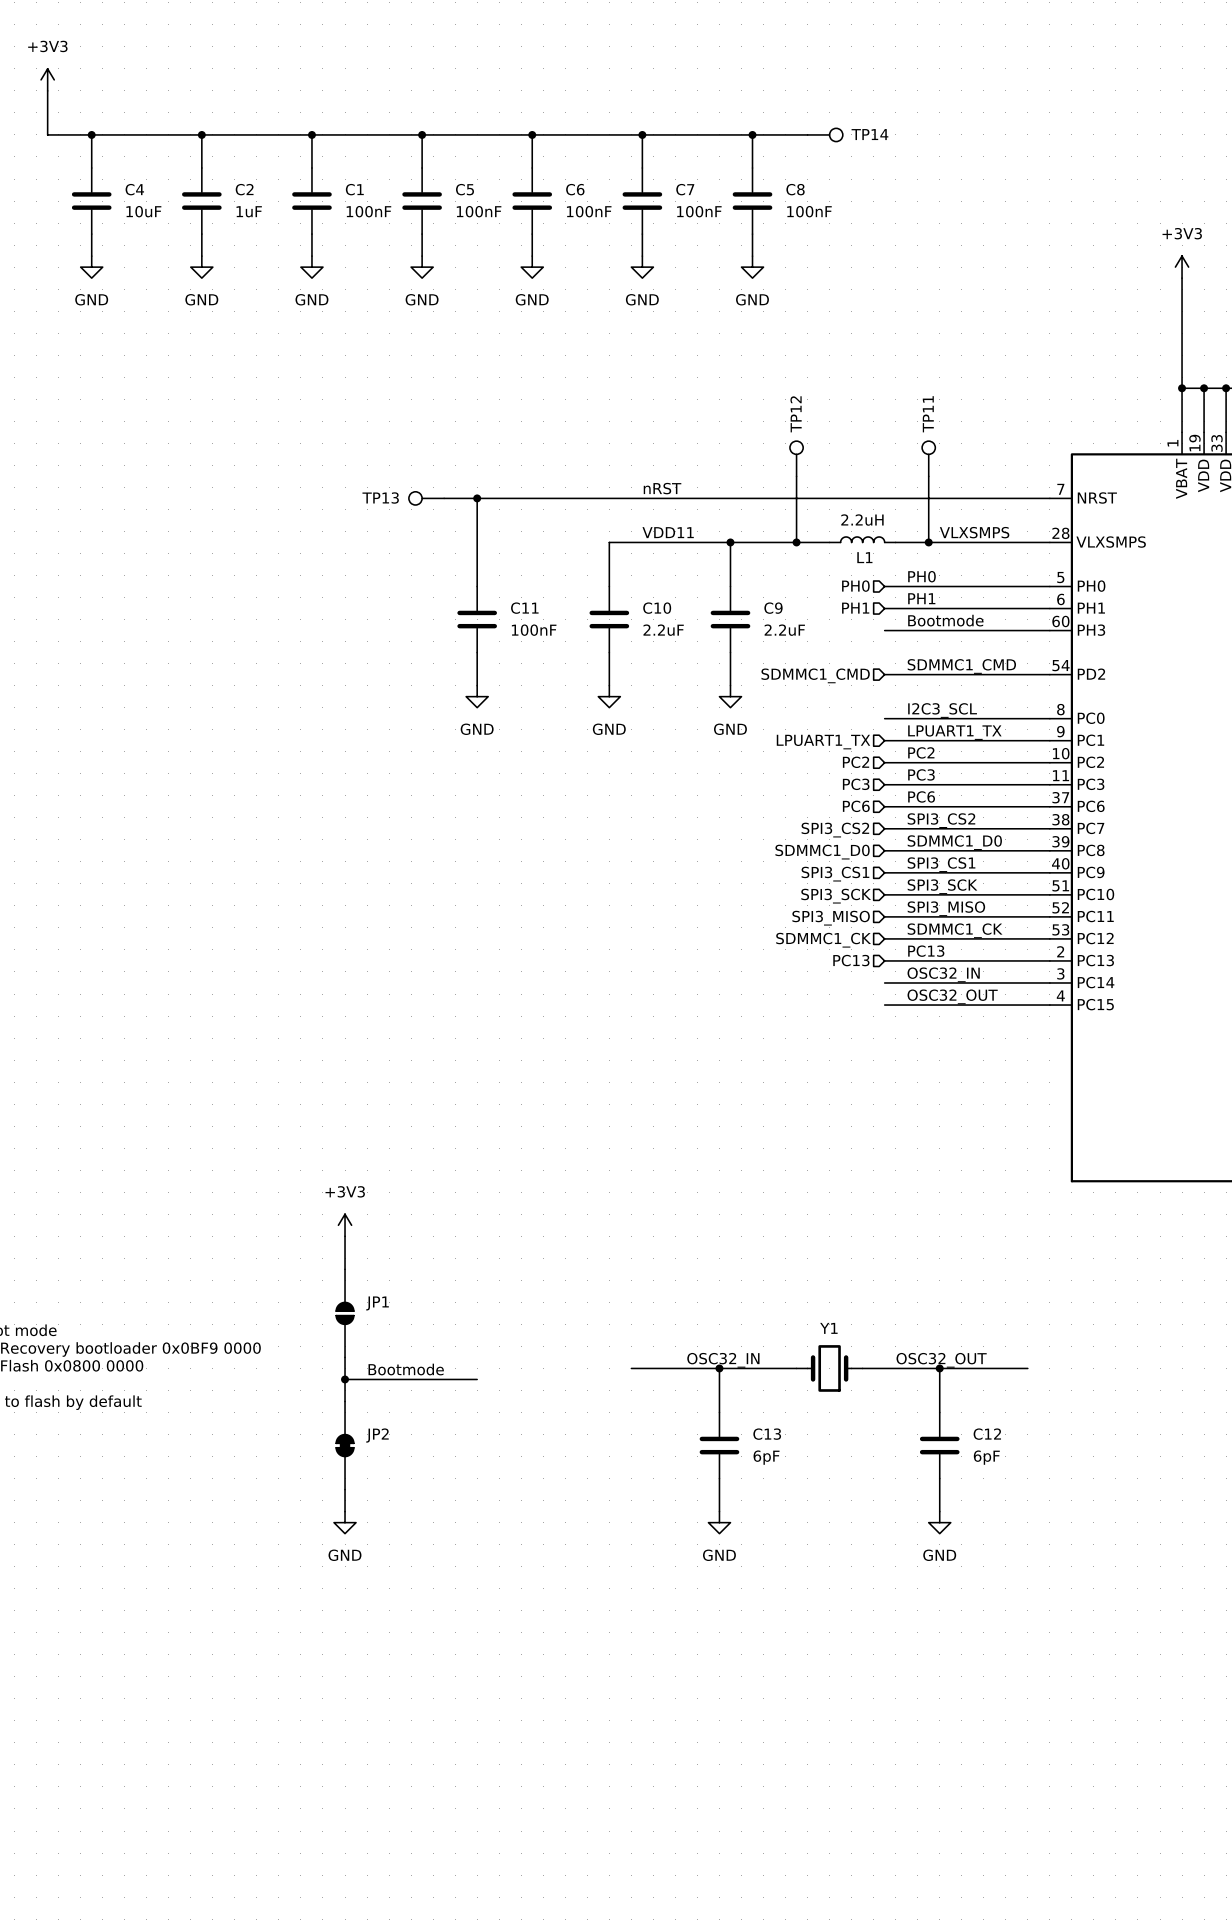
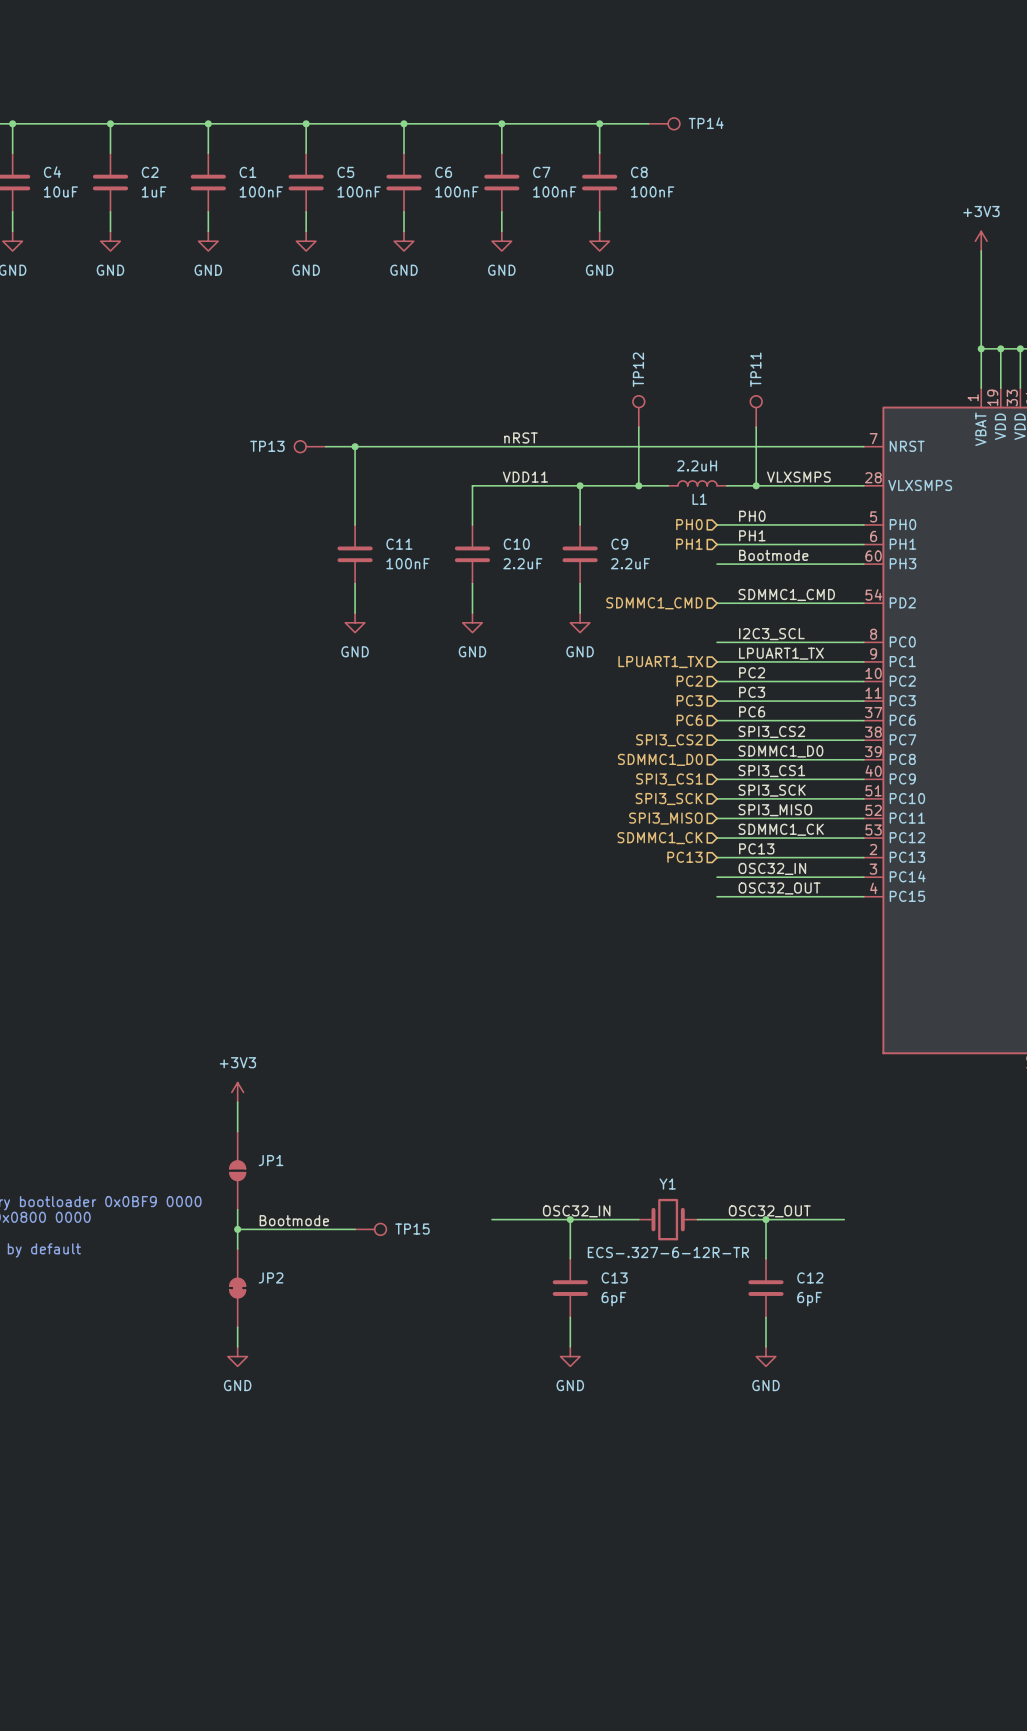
TP15: none -> (370, 1229)
Y1 value: none -> ECS-.327-6-12R-TR (668, 1252)

